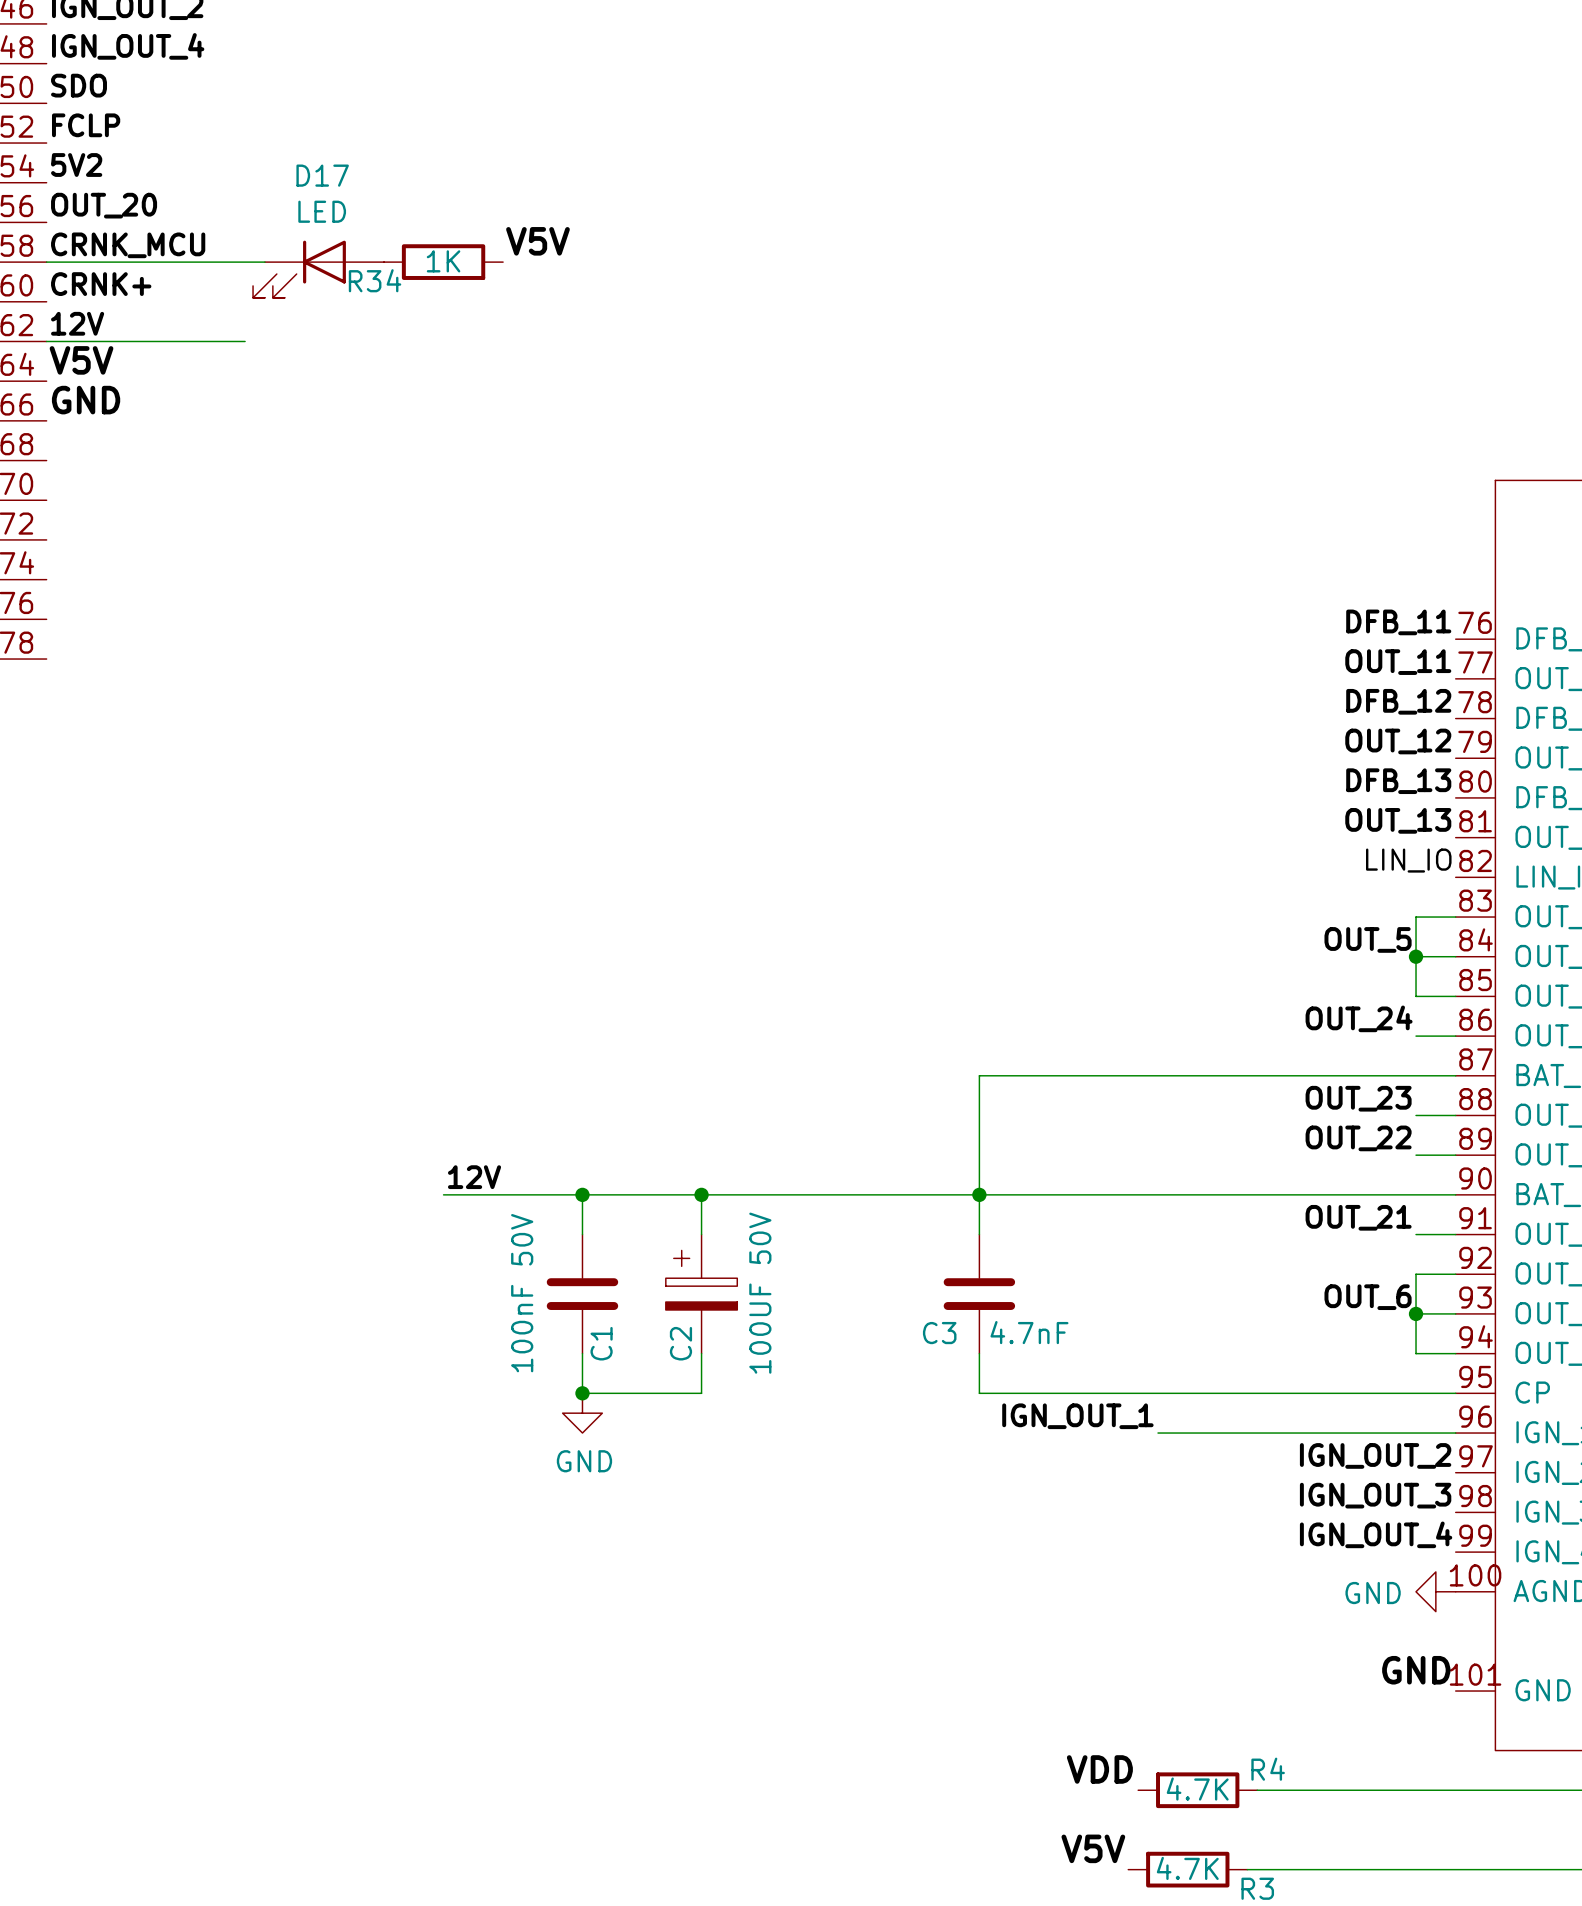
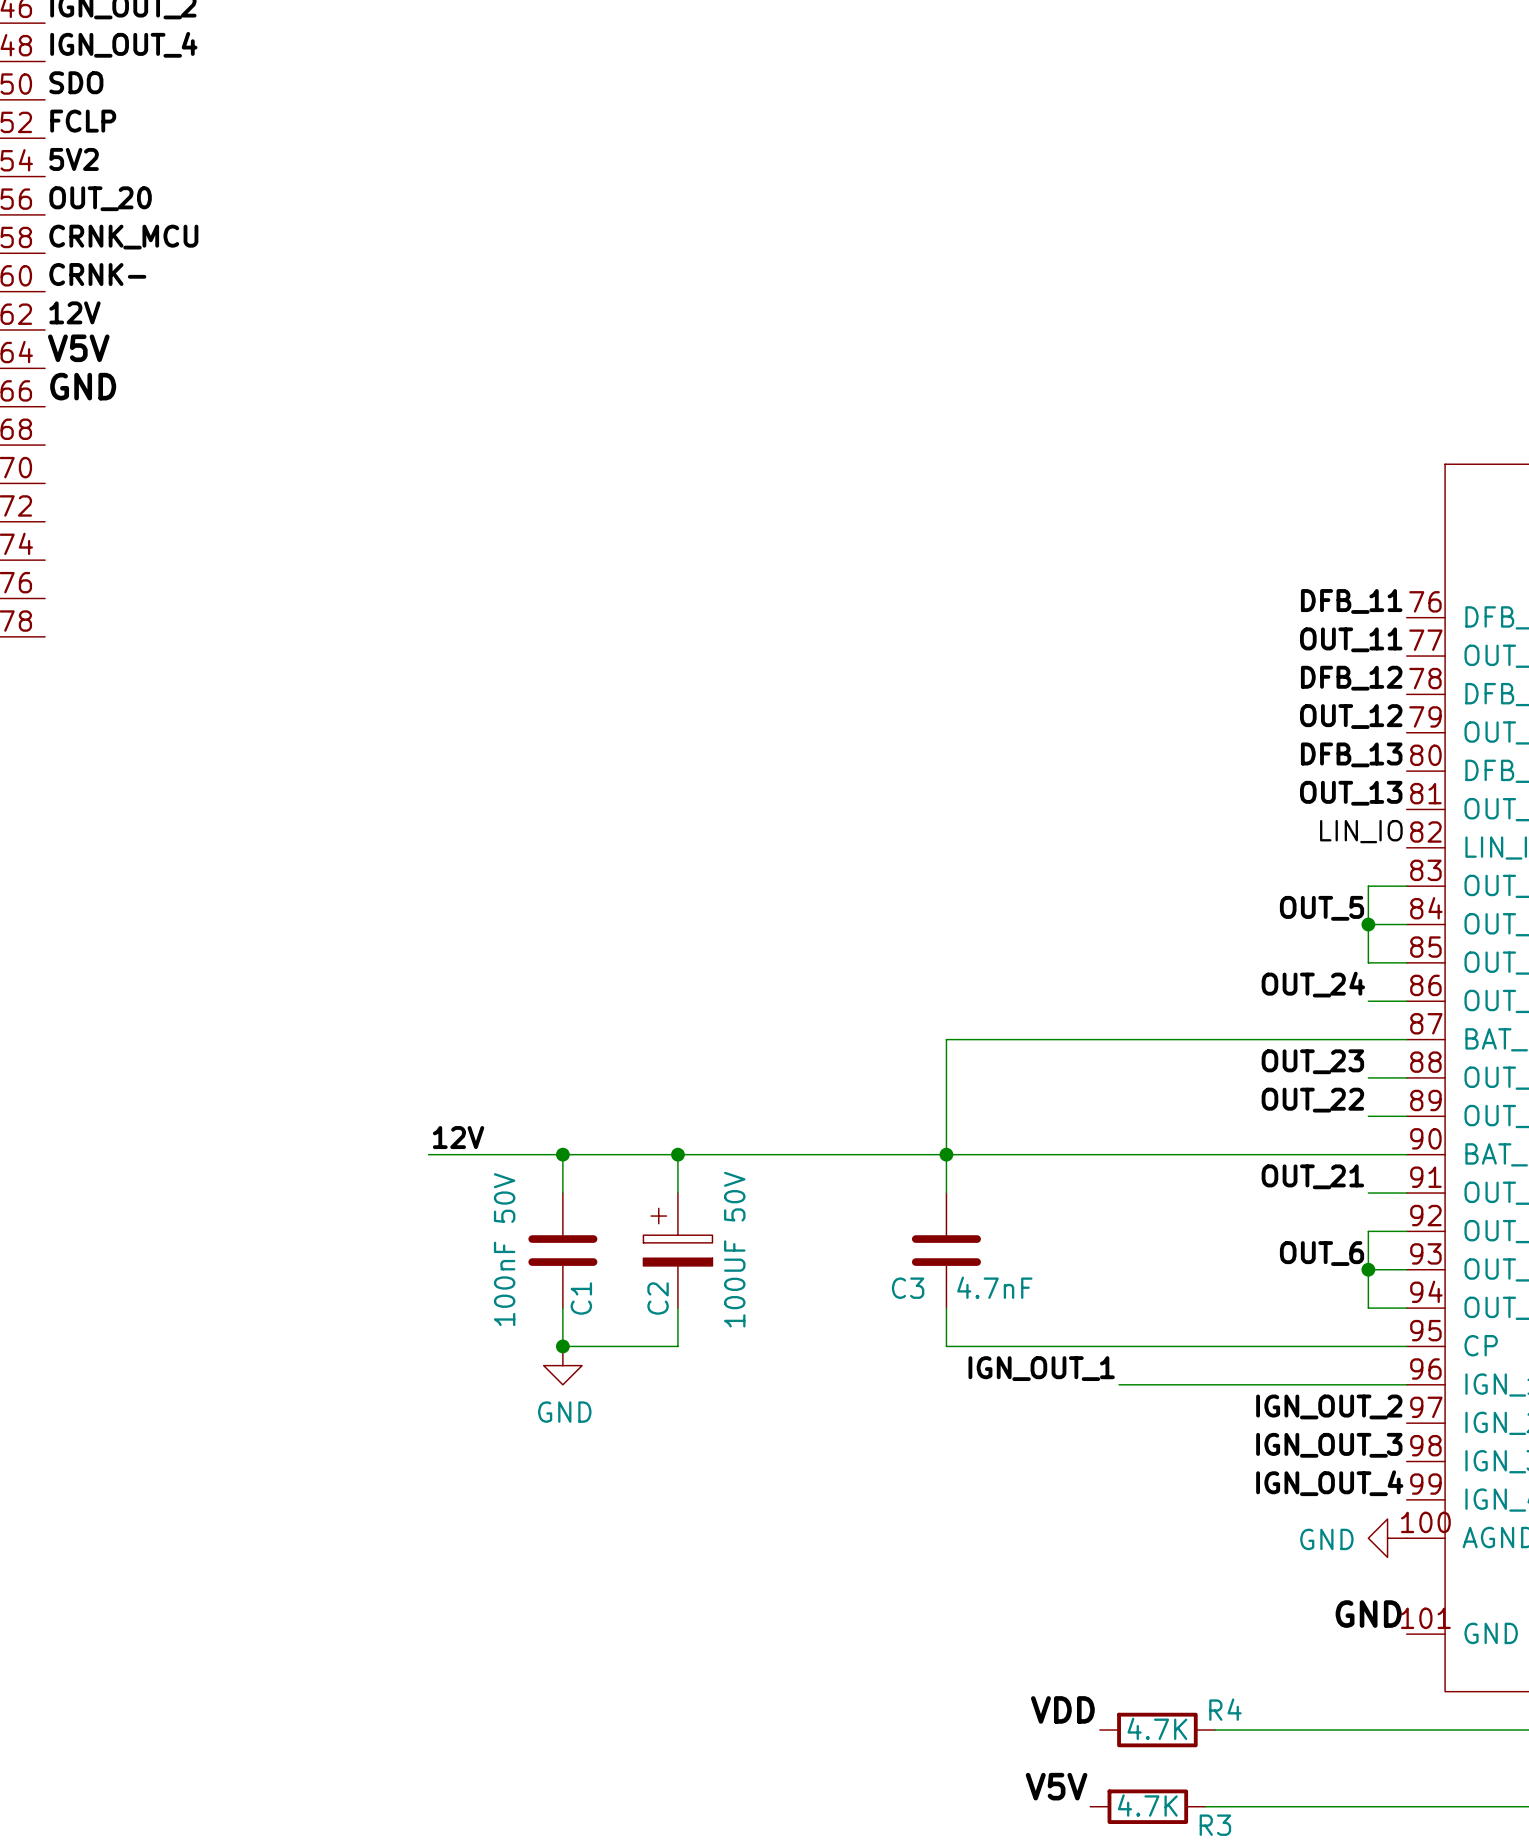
label: V5V (537, 241) -> none
wire: (46, 262) (264, 262) -> none
R34: 1K (443, 262) -> none
D17: LED (318, 269) -> none
label: CRNK+ (101, 284) -> CRNK- (97, 274)
wire: (46, 341) (245, 341) -> none

